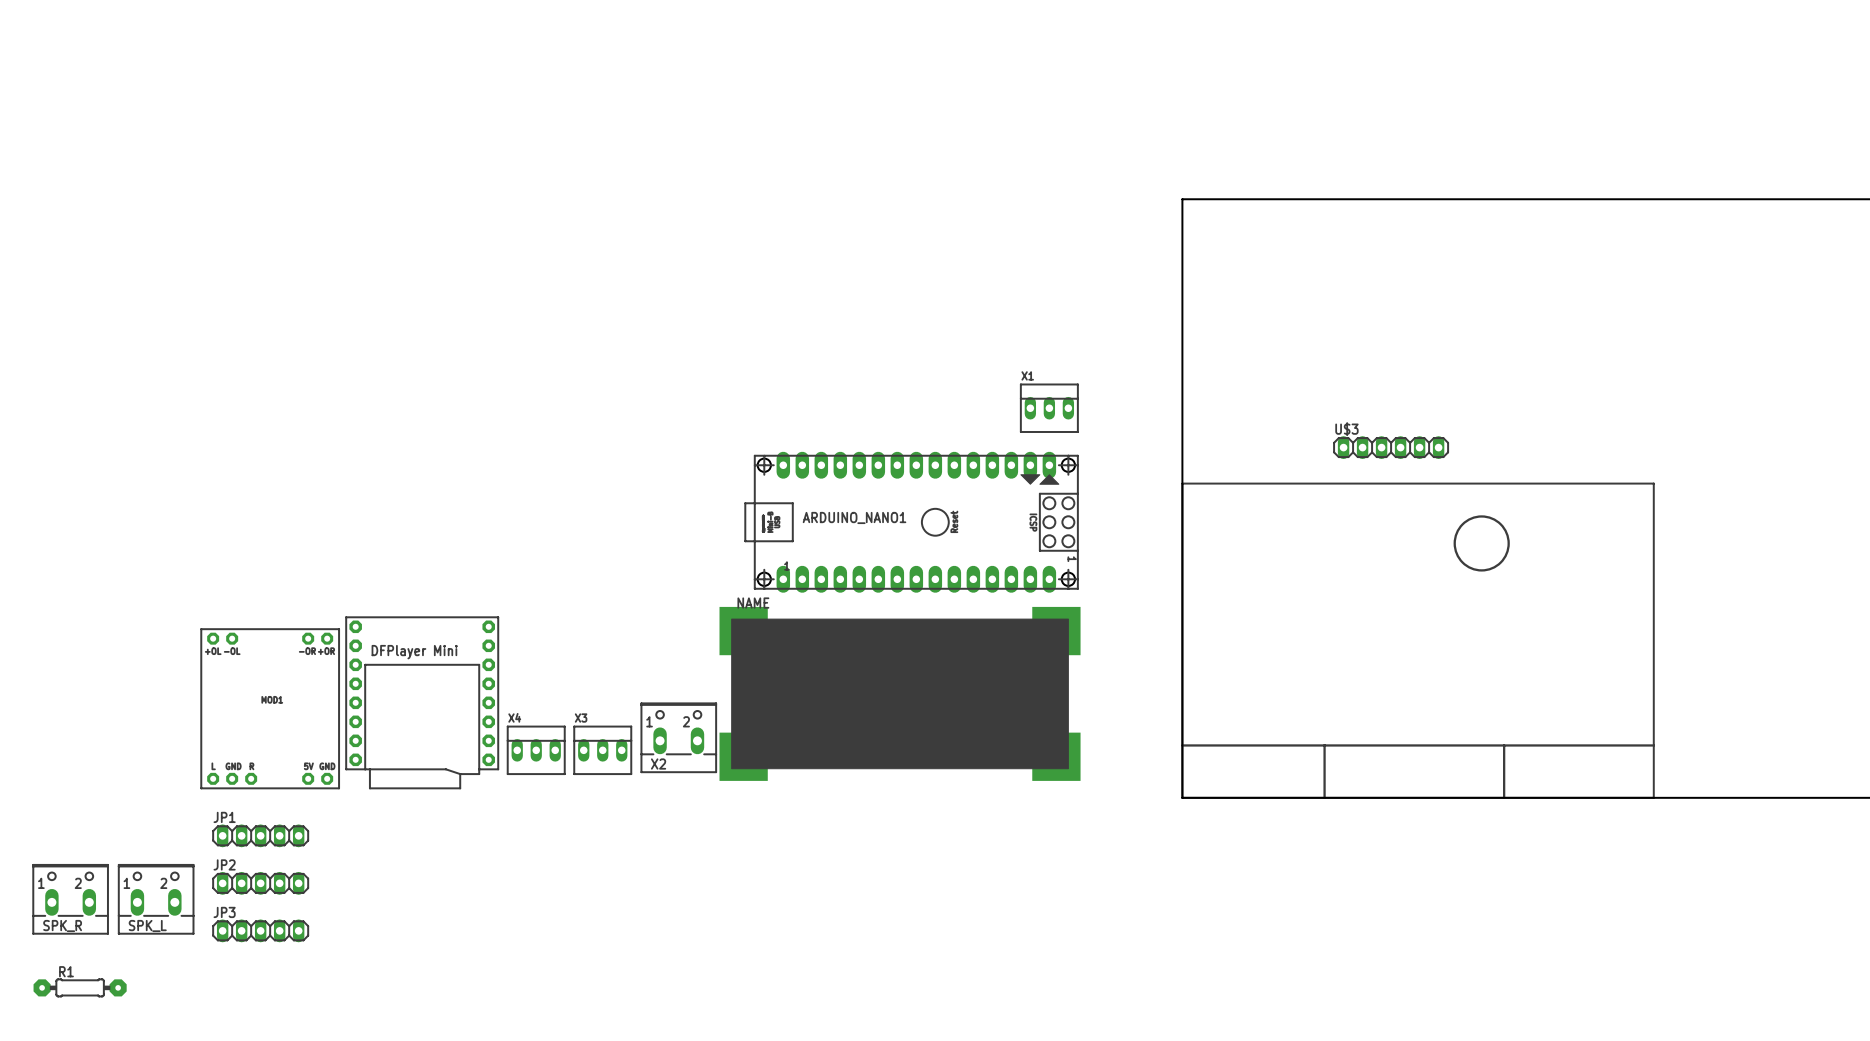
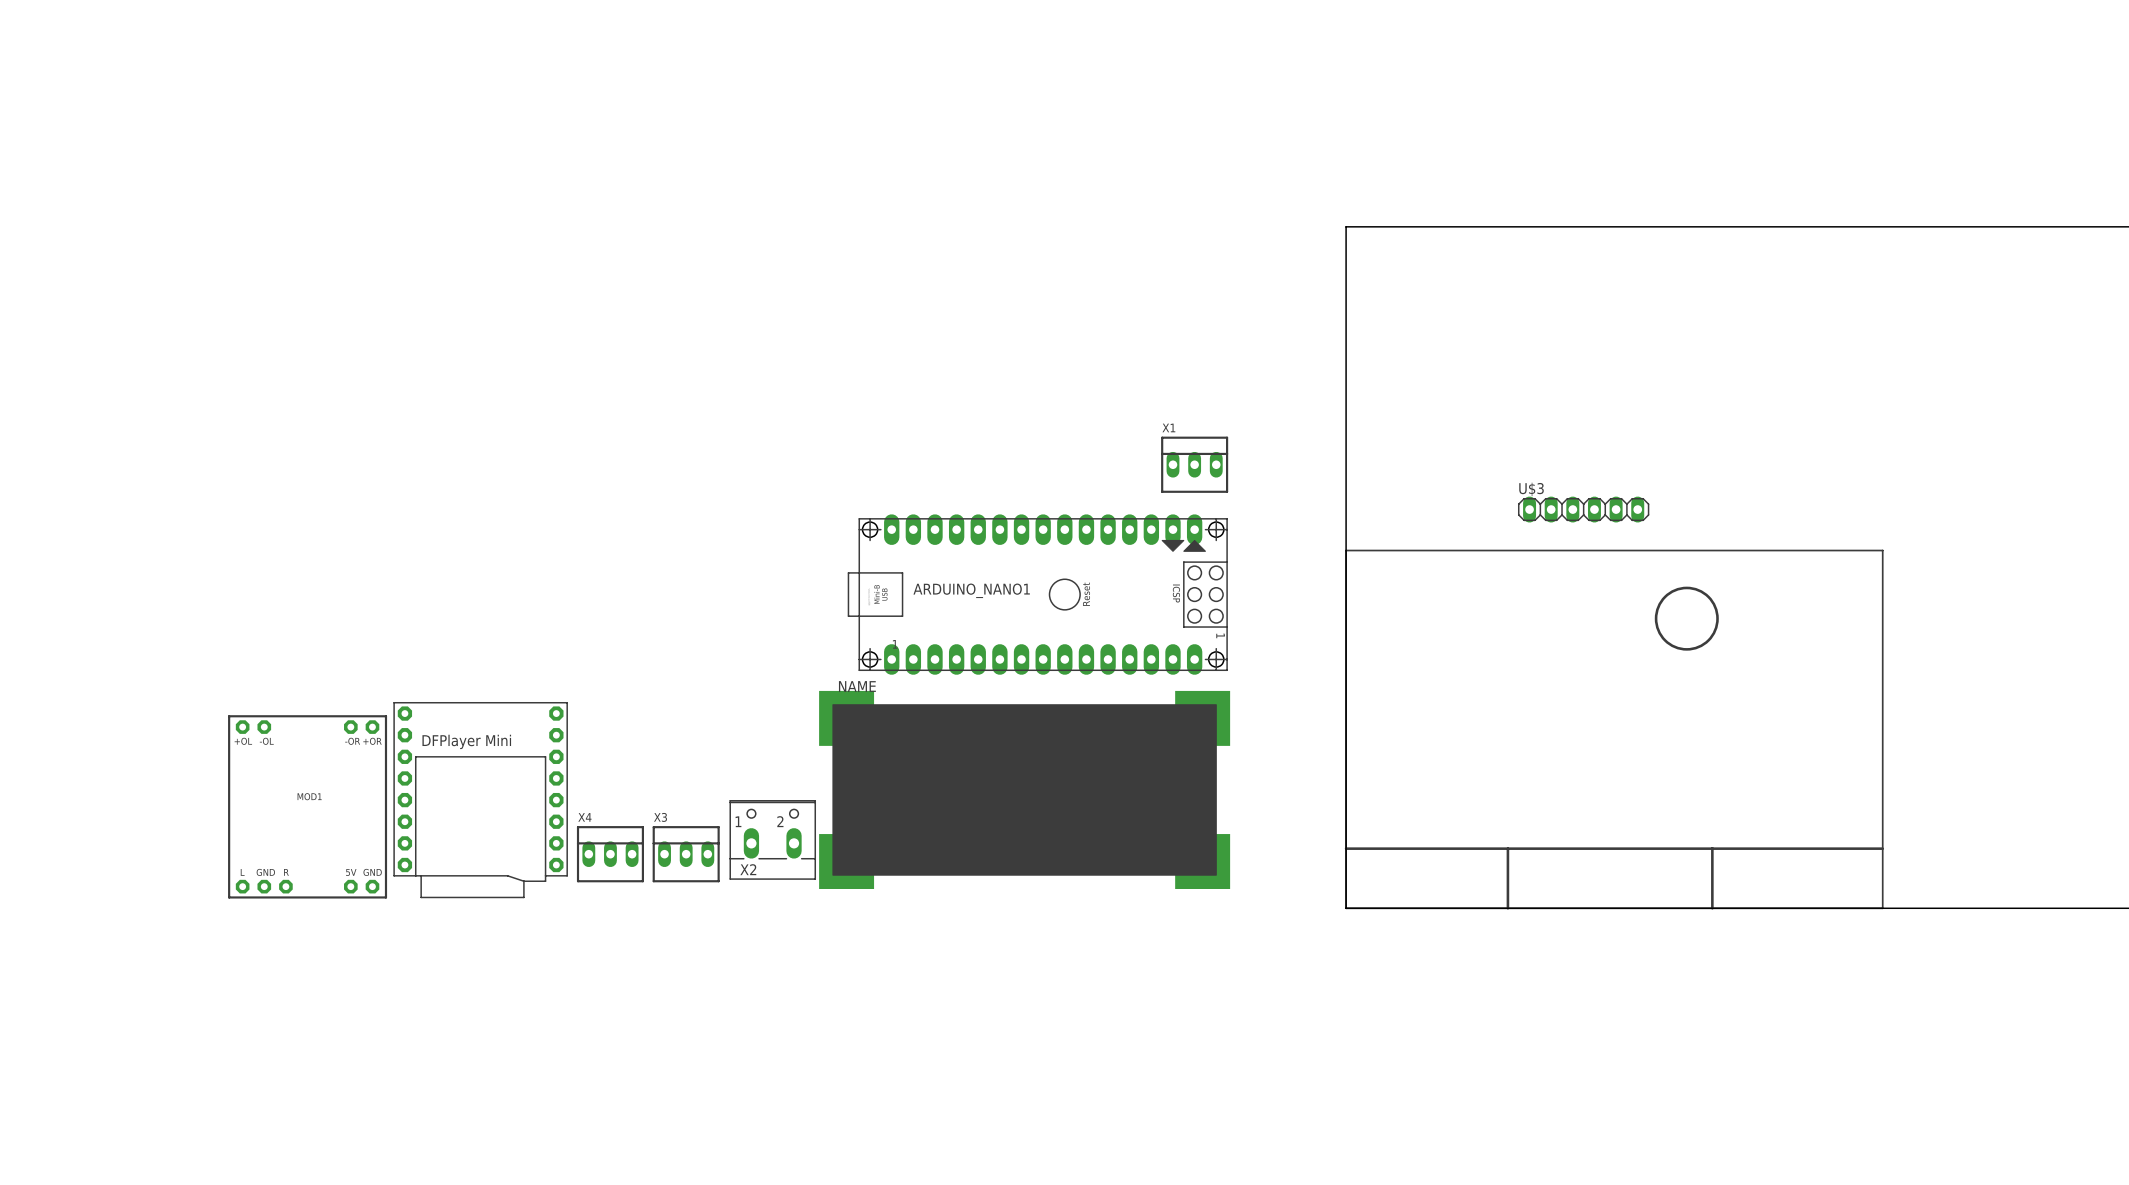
JP1: (260, 835) -> none
JP2: (260, 883) -> none
SPK_R: (70, 899) -> none
SPK_L: (156, 899) -> none
JP3: (260, 930) -> none
R1: (80, 987) -> none

